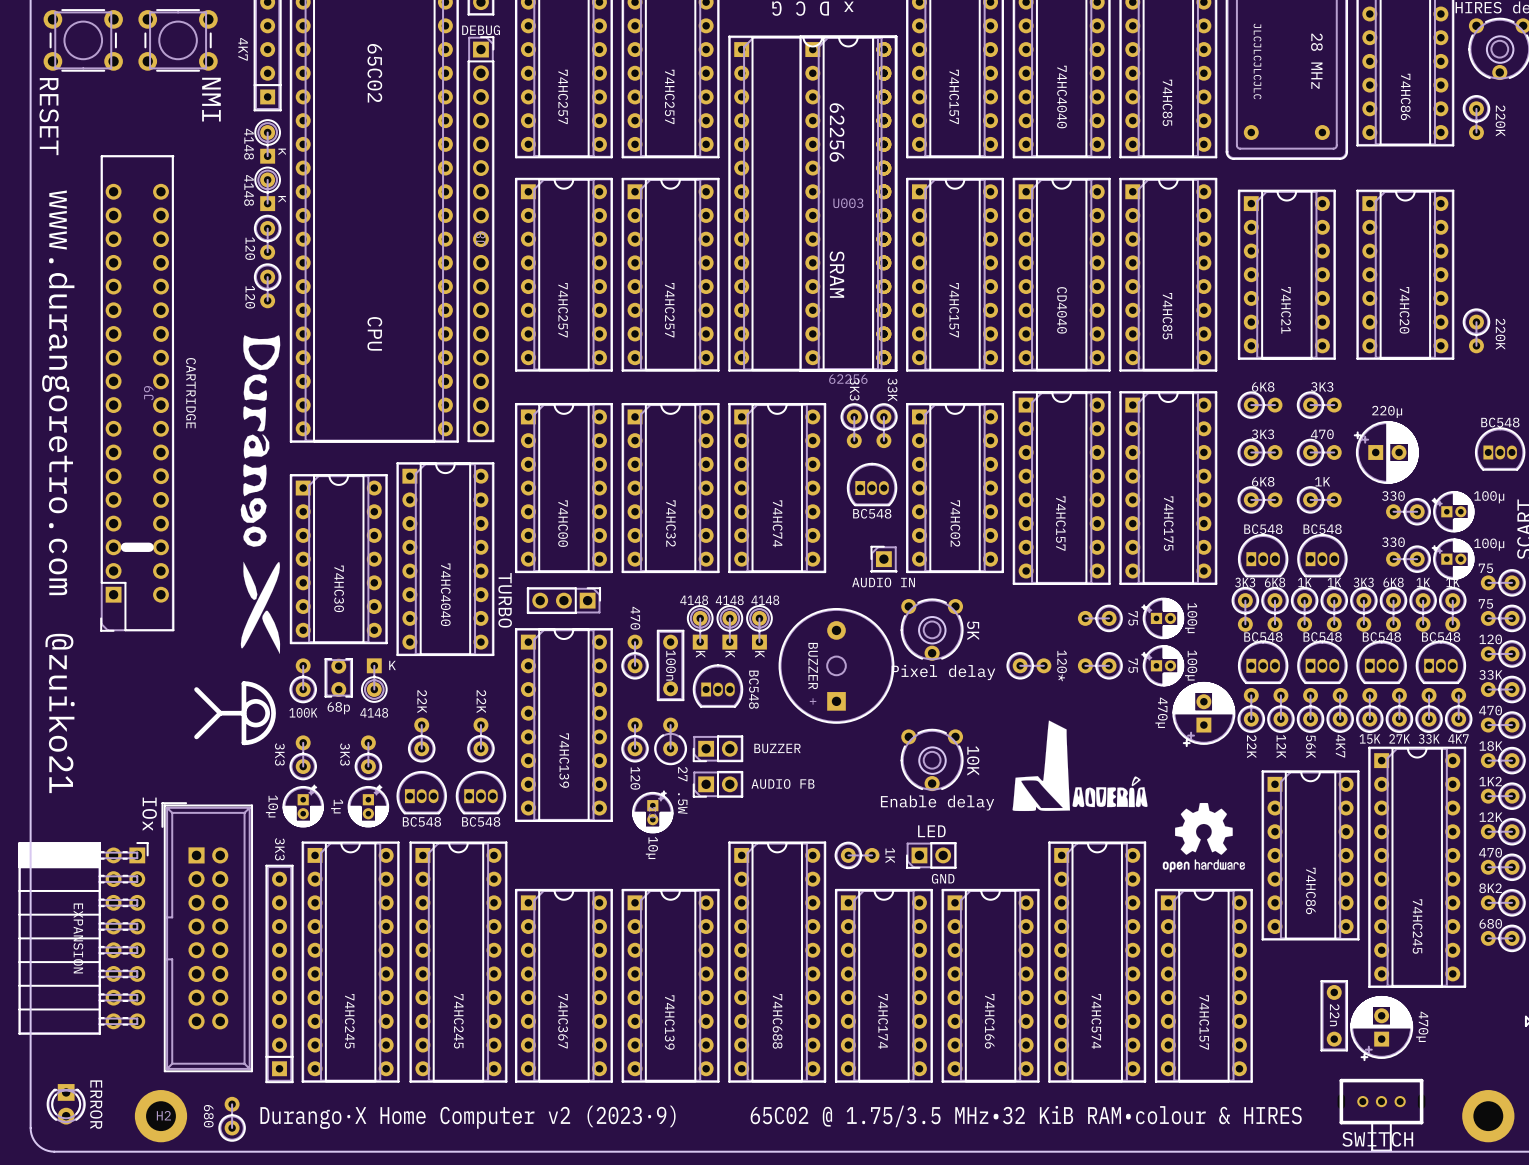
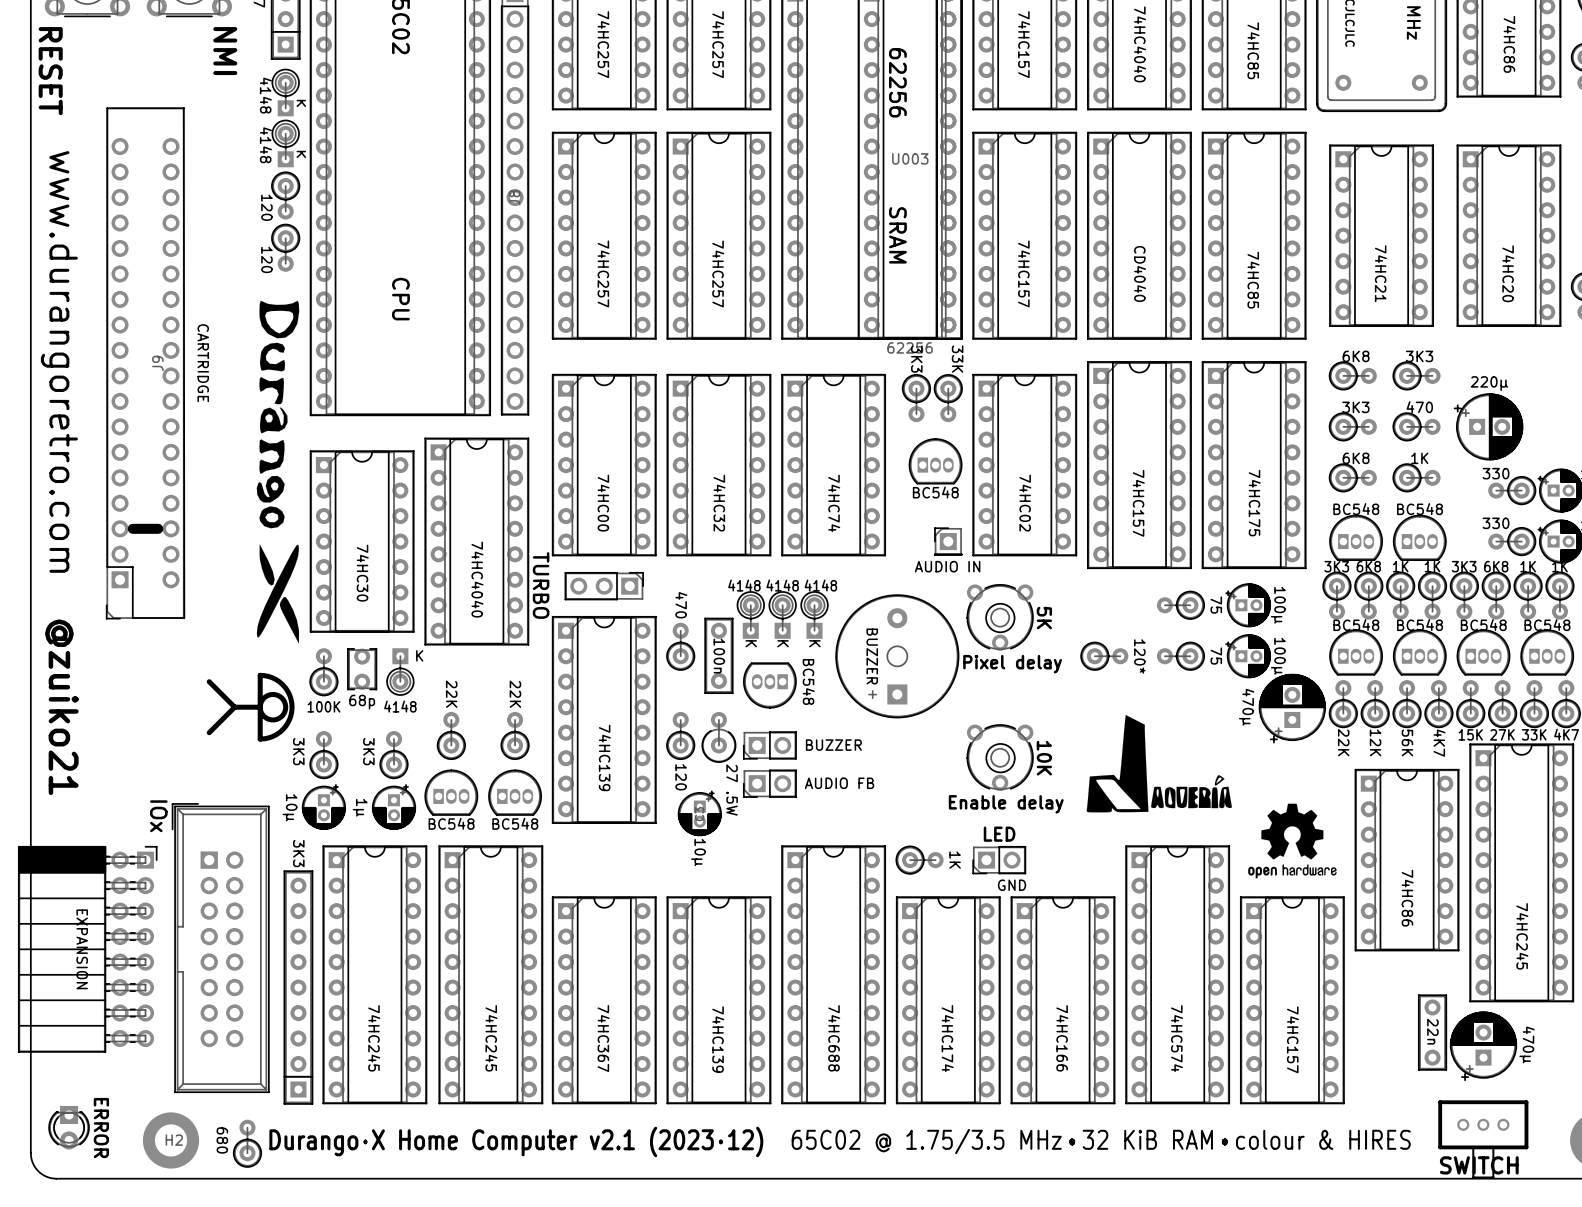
part rotation: 0° (717, 686) -> 180° (769, 685)
text: Durango·X Home Computer v2 (2023·9) (468, 1117) -> Durango·X Home Computer v2.1 (2023·12) (516, 1141)

